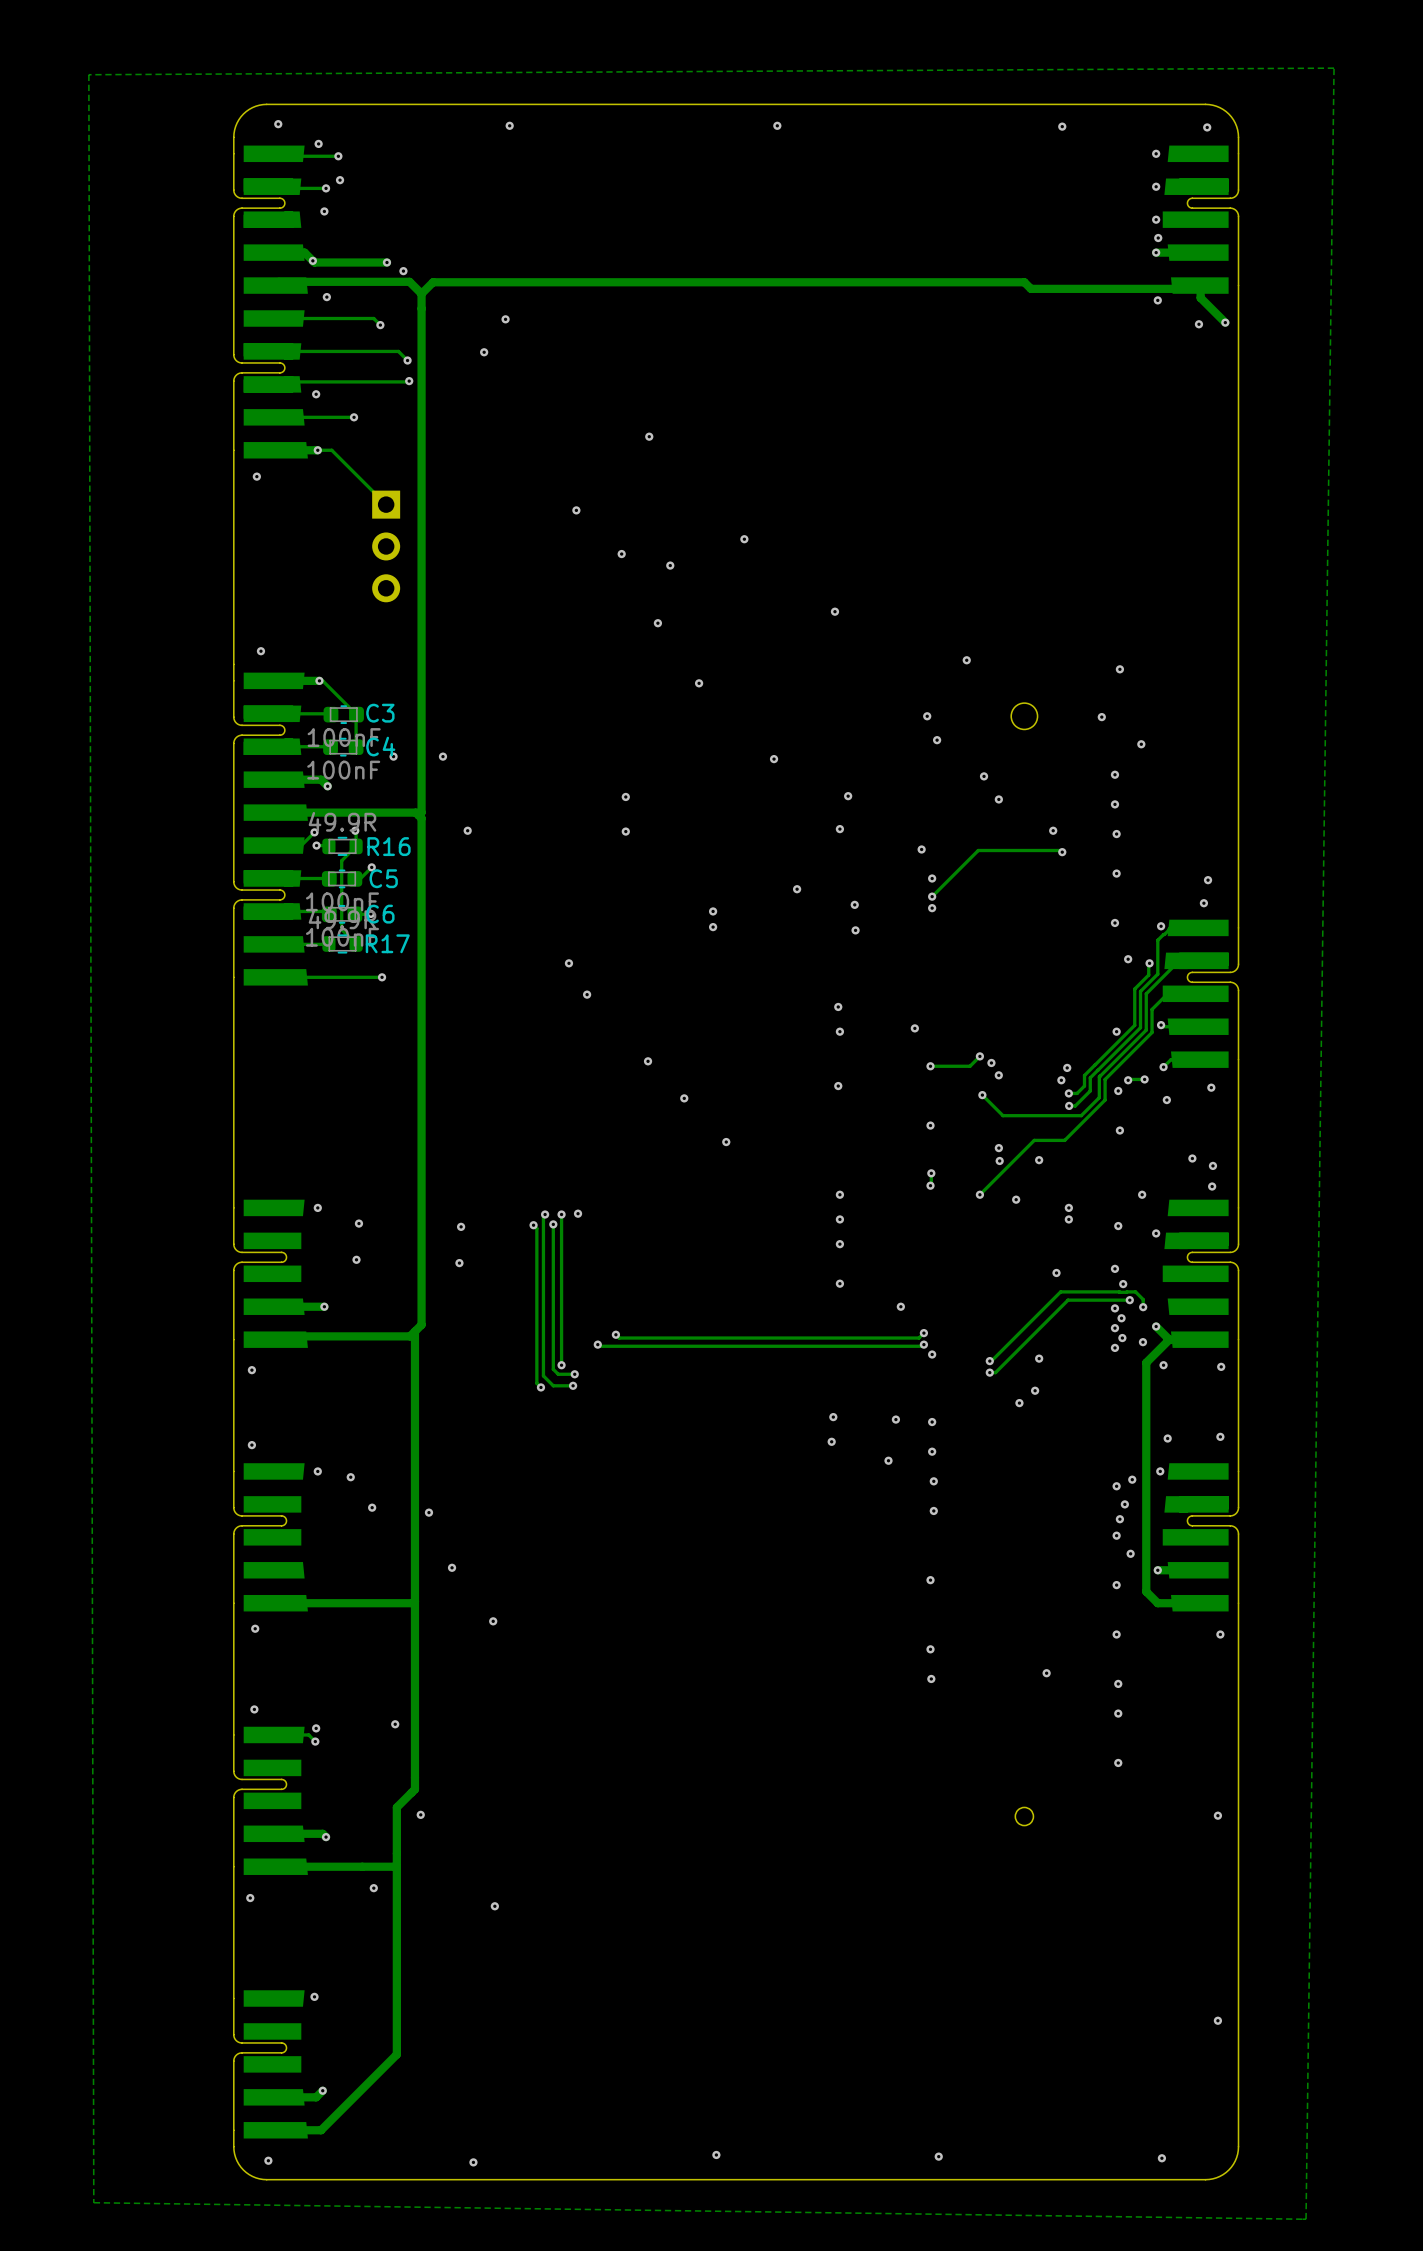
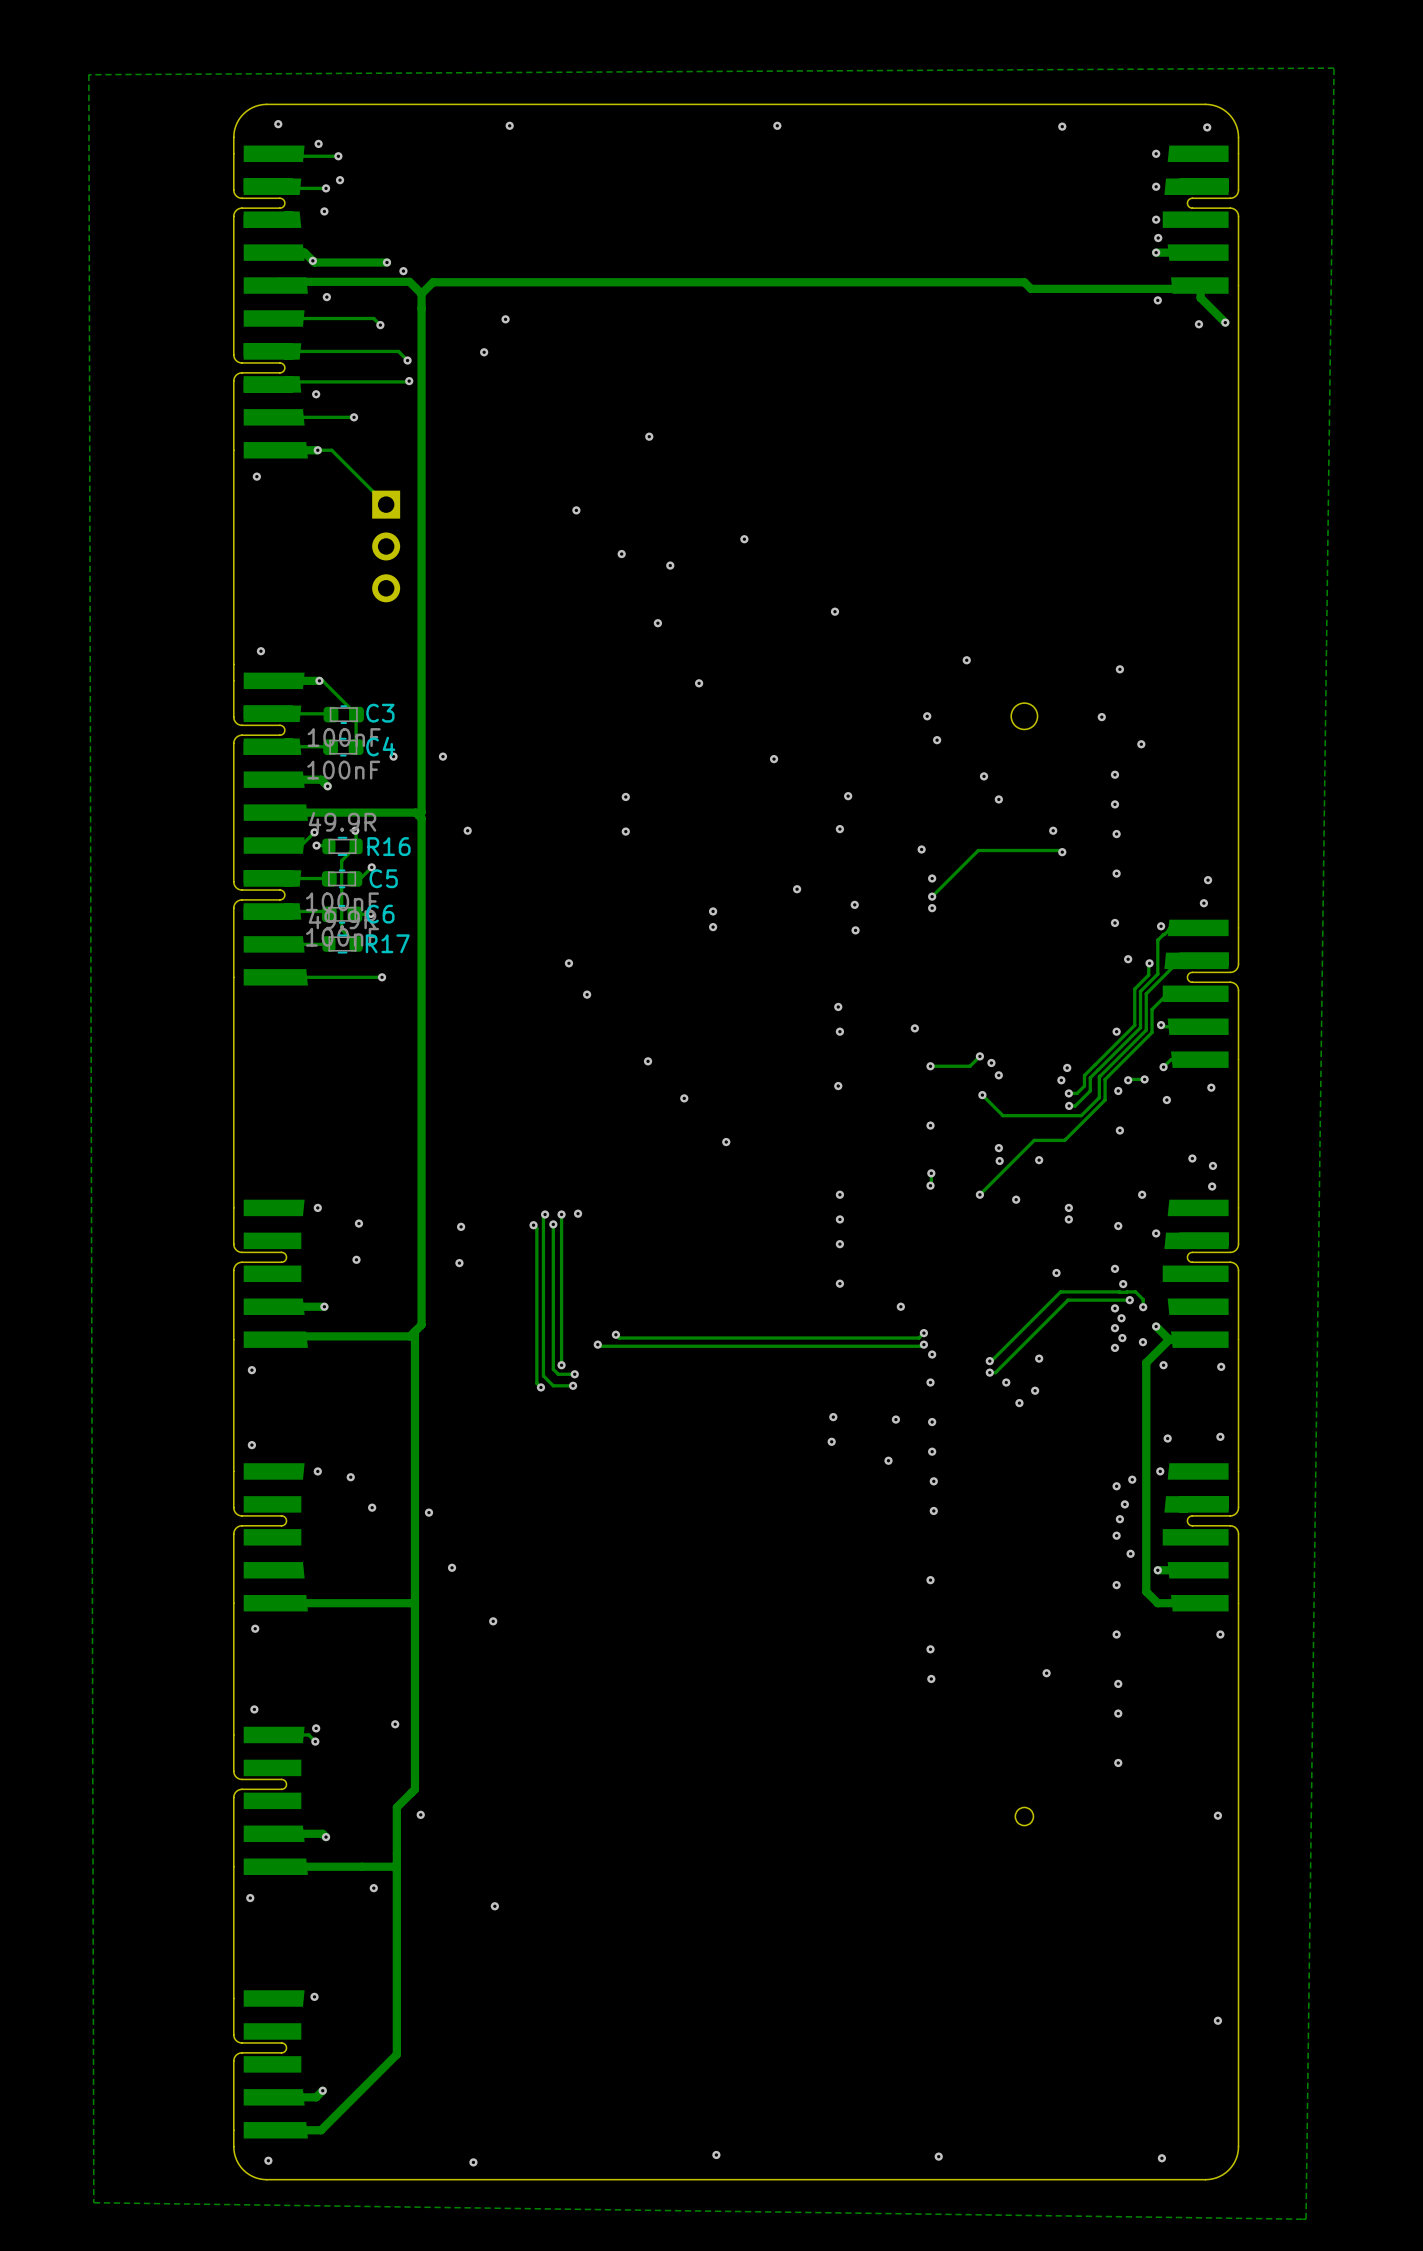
via: none -> (930, 1382)
via: none -> (1006, 1382)

